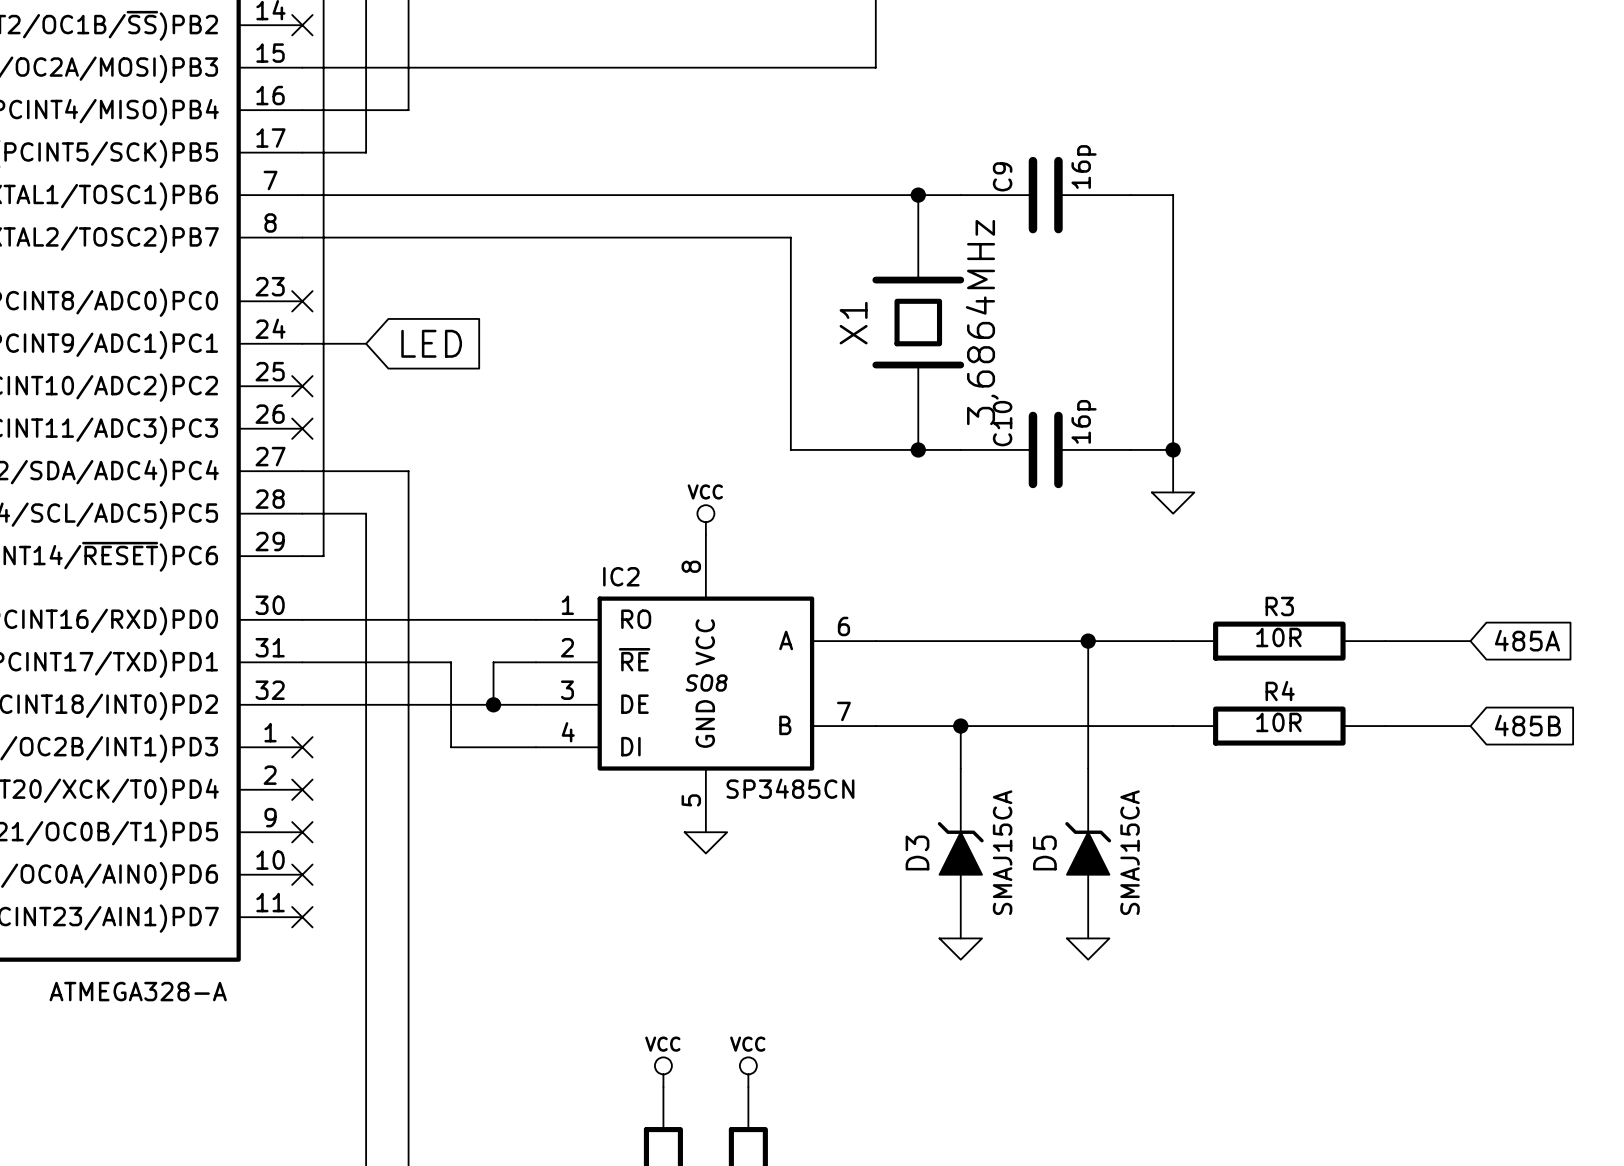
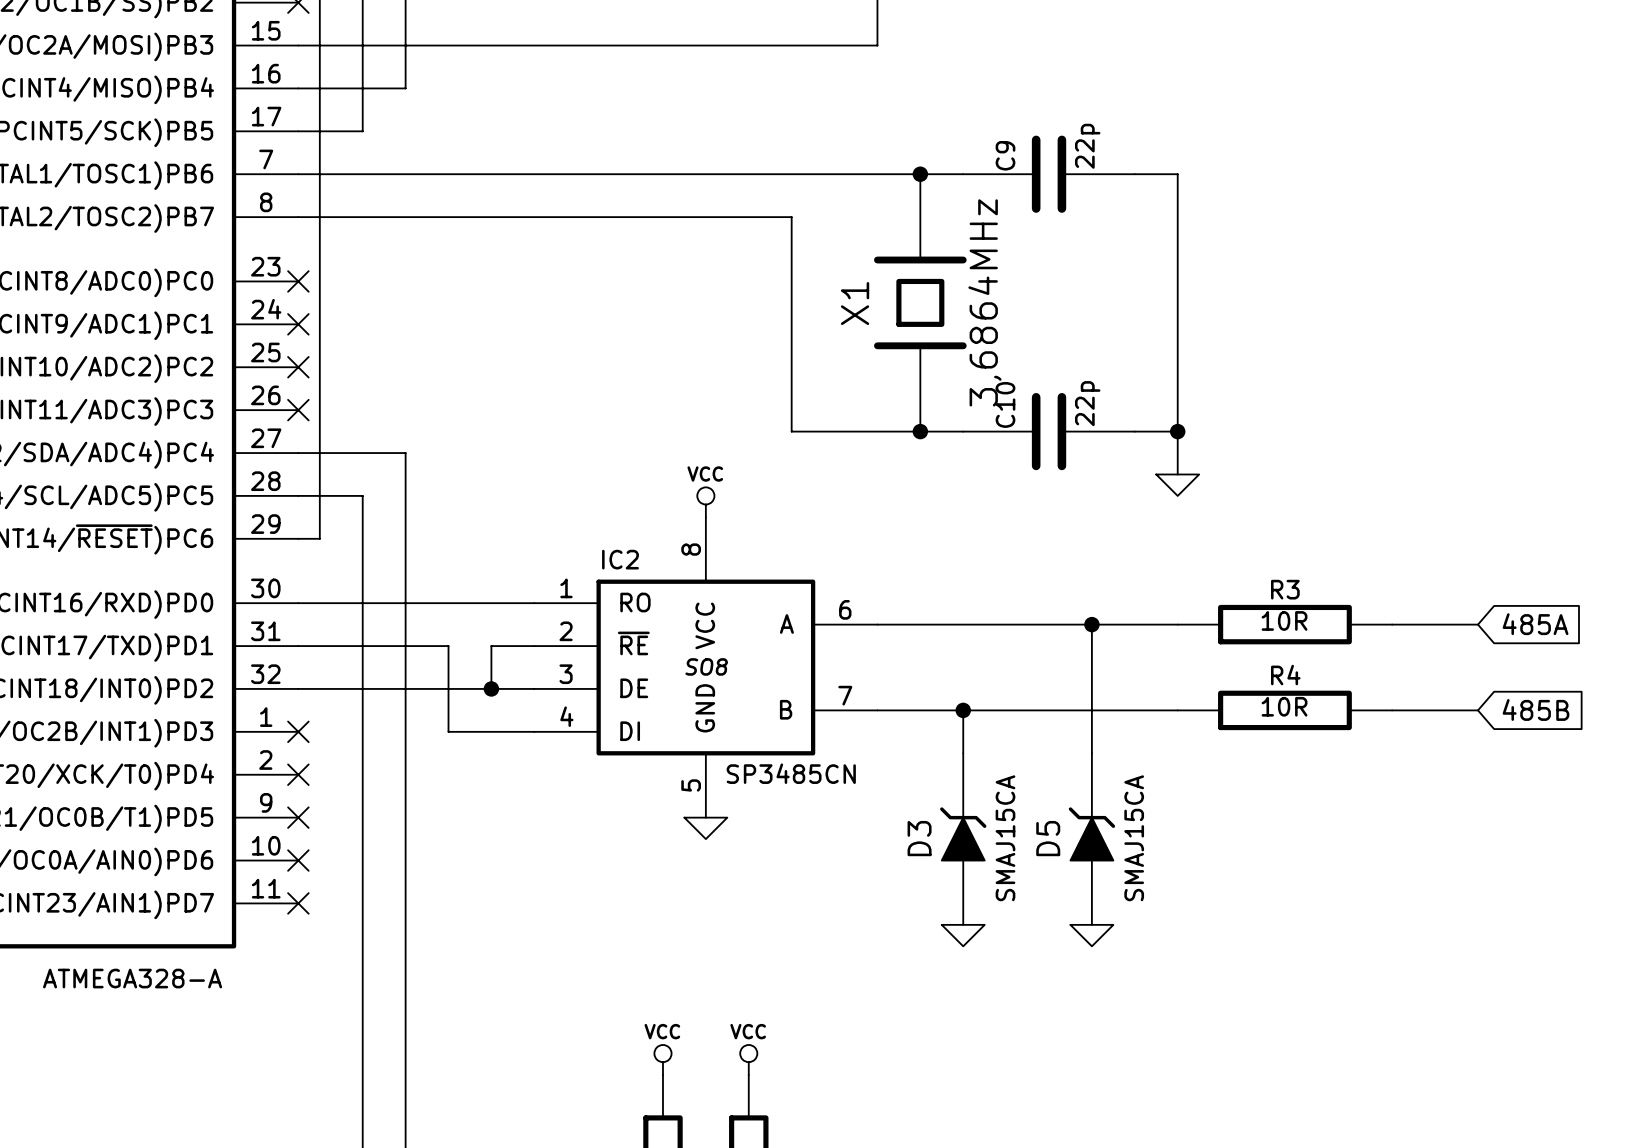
C9 value: 16p (1084, 167) -> 22p (1087, 146)
wire: (302, 343) (366, 343) -> none
no-connect mark: none -> (298, 324)
global label: LED (431, 343) -> none
C10 value: 16p (1084, 421) -> 22p (1087, 403)

